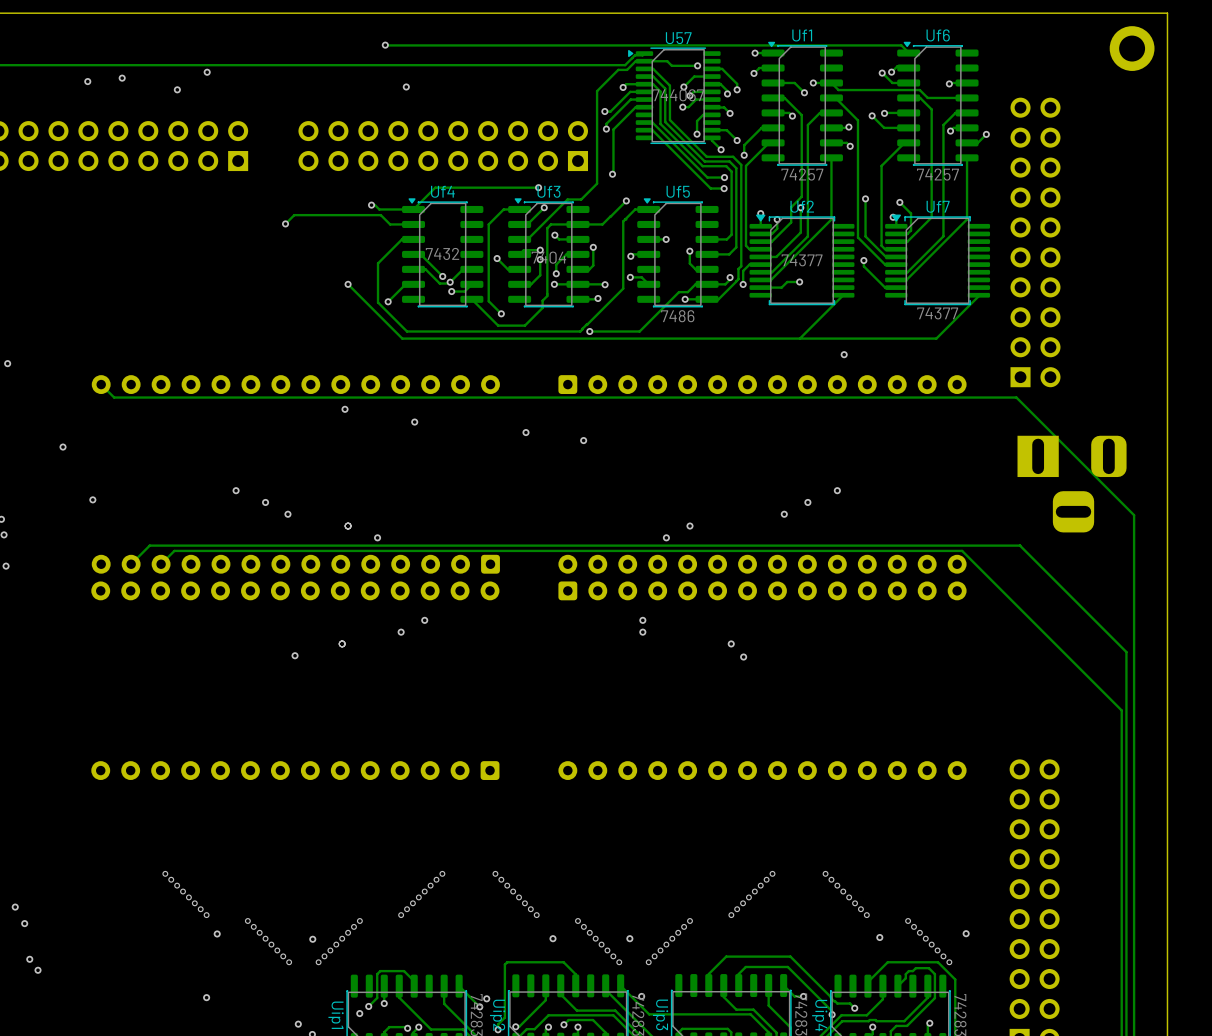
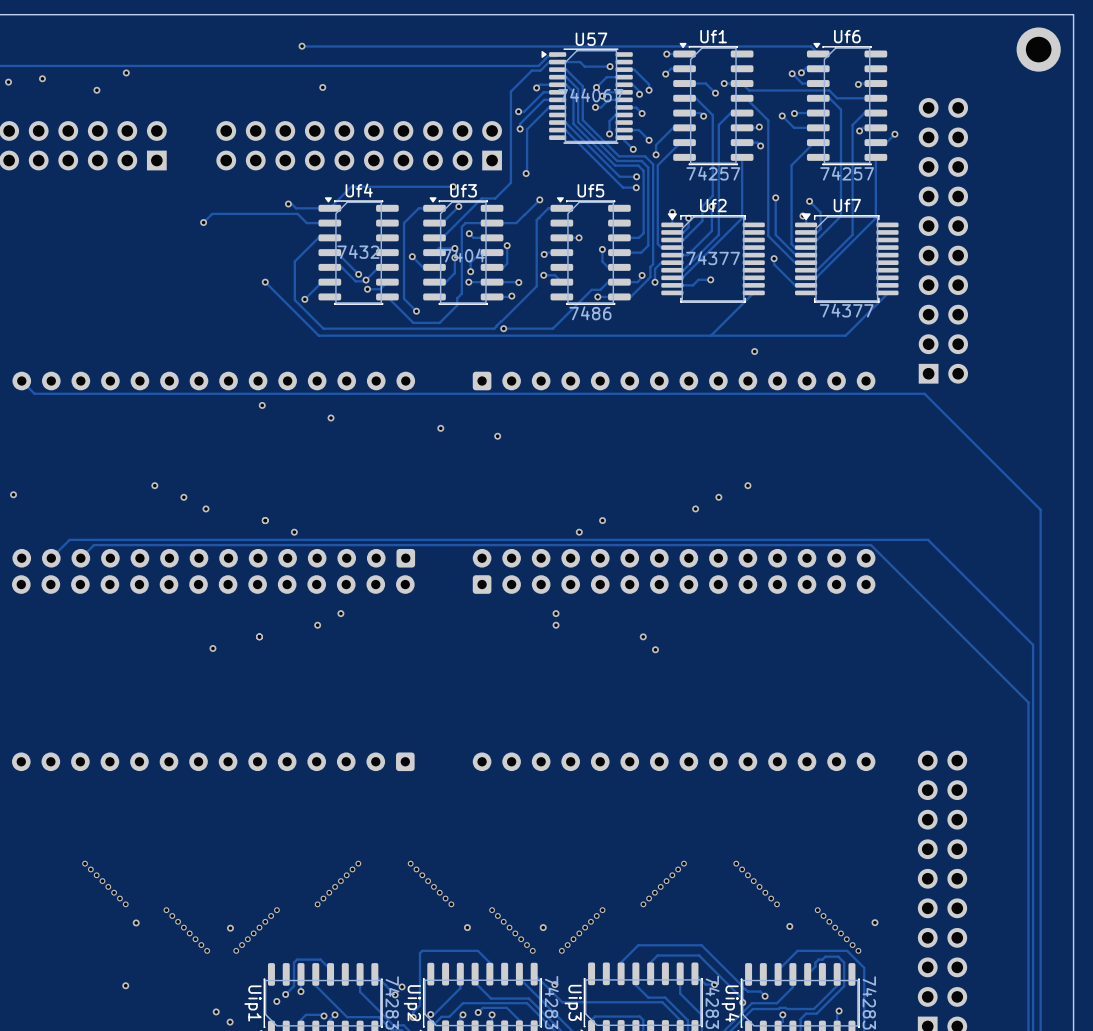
part: (1072, 484) -> none

